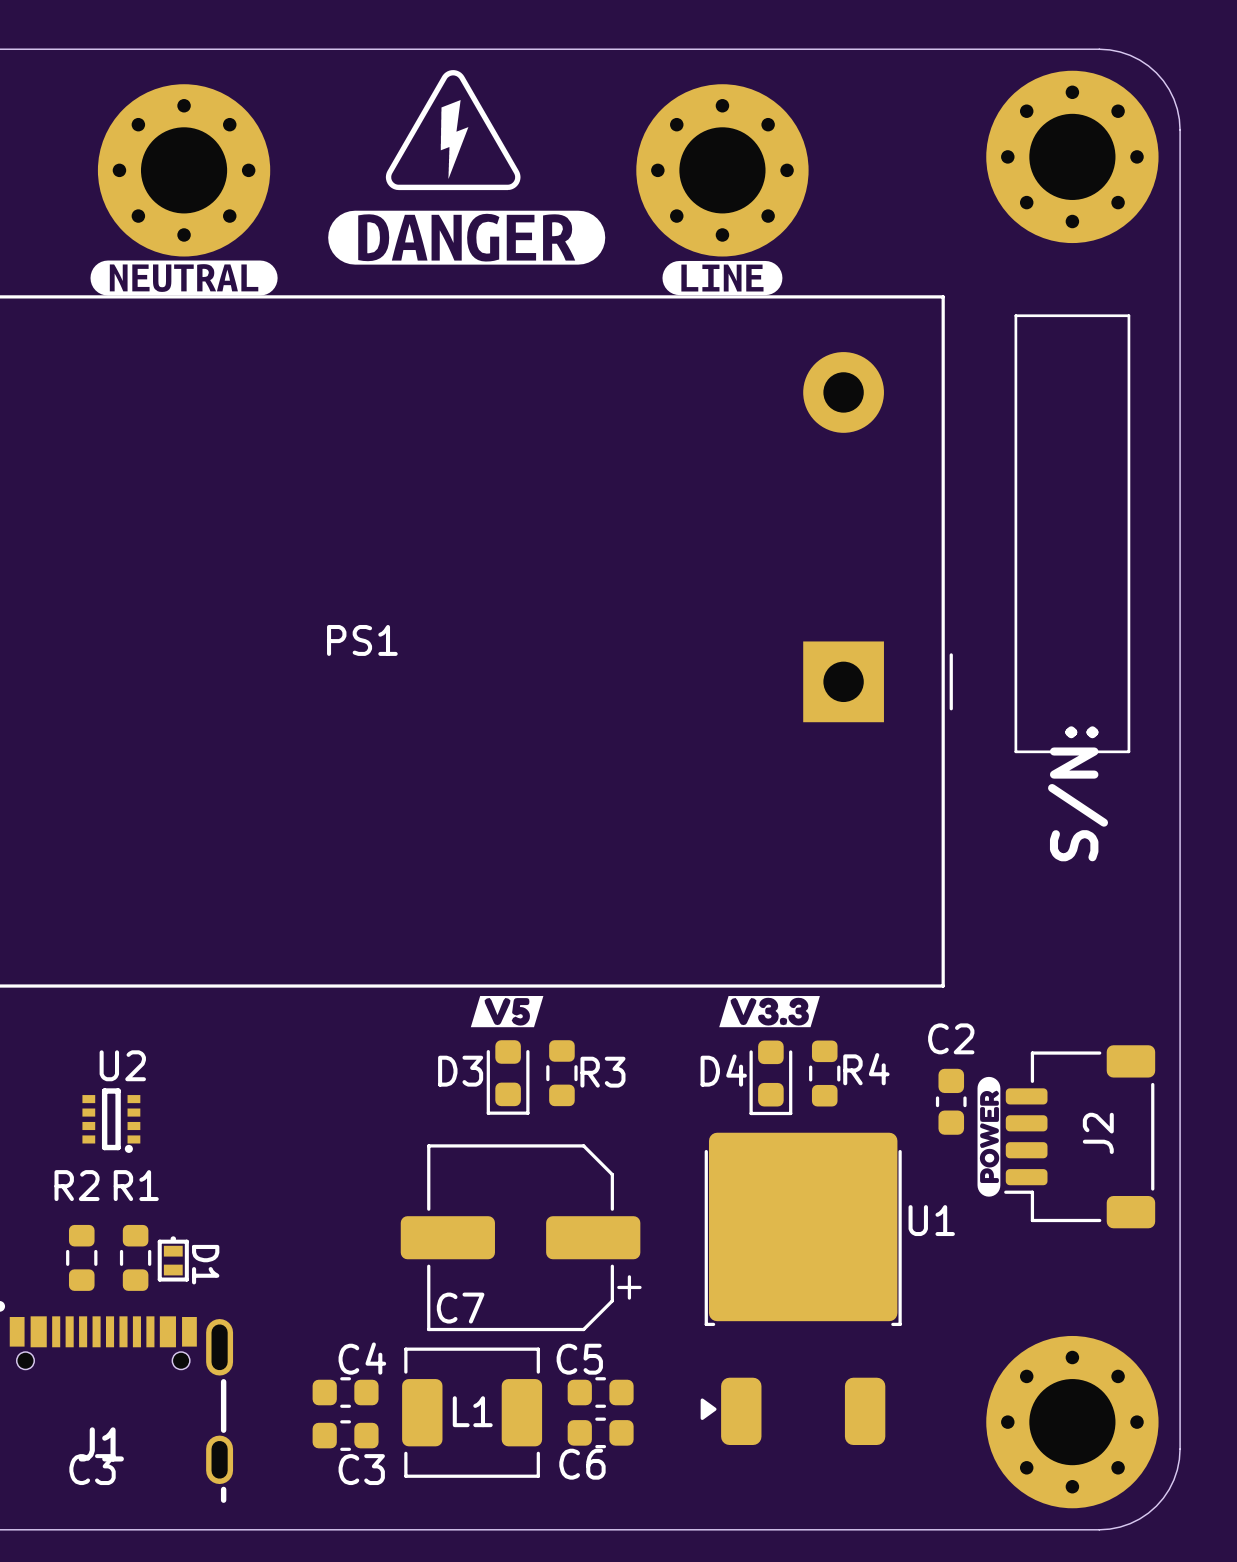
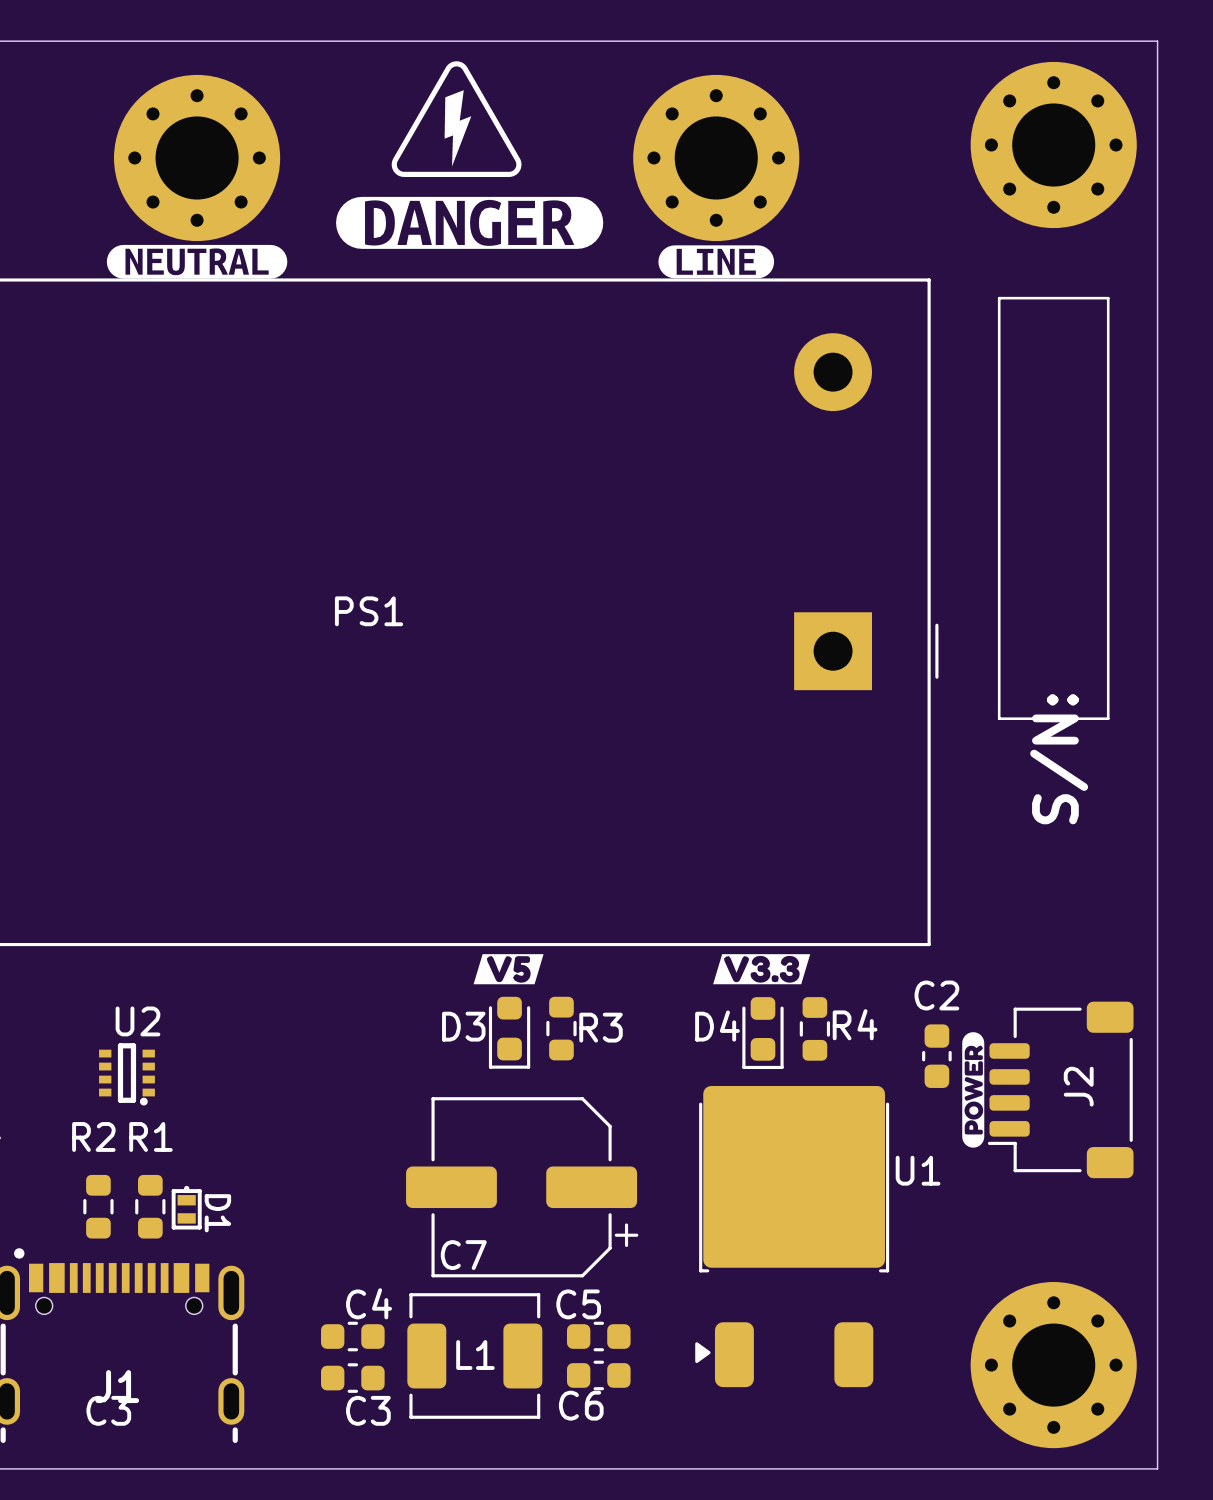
board edge: (1099, 49) (1130, 55) (1156, 72) (1173, 99) (1180, 129) -> (1079, 41) (1157, 41) (1157, 119)
board edge: (1180, 1449) (1173, 1479) (1156, 1506) (1130, 1523) (1099, 1529) -> (1157, 1391) (1157, 1468) (1079, 1468)

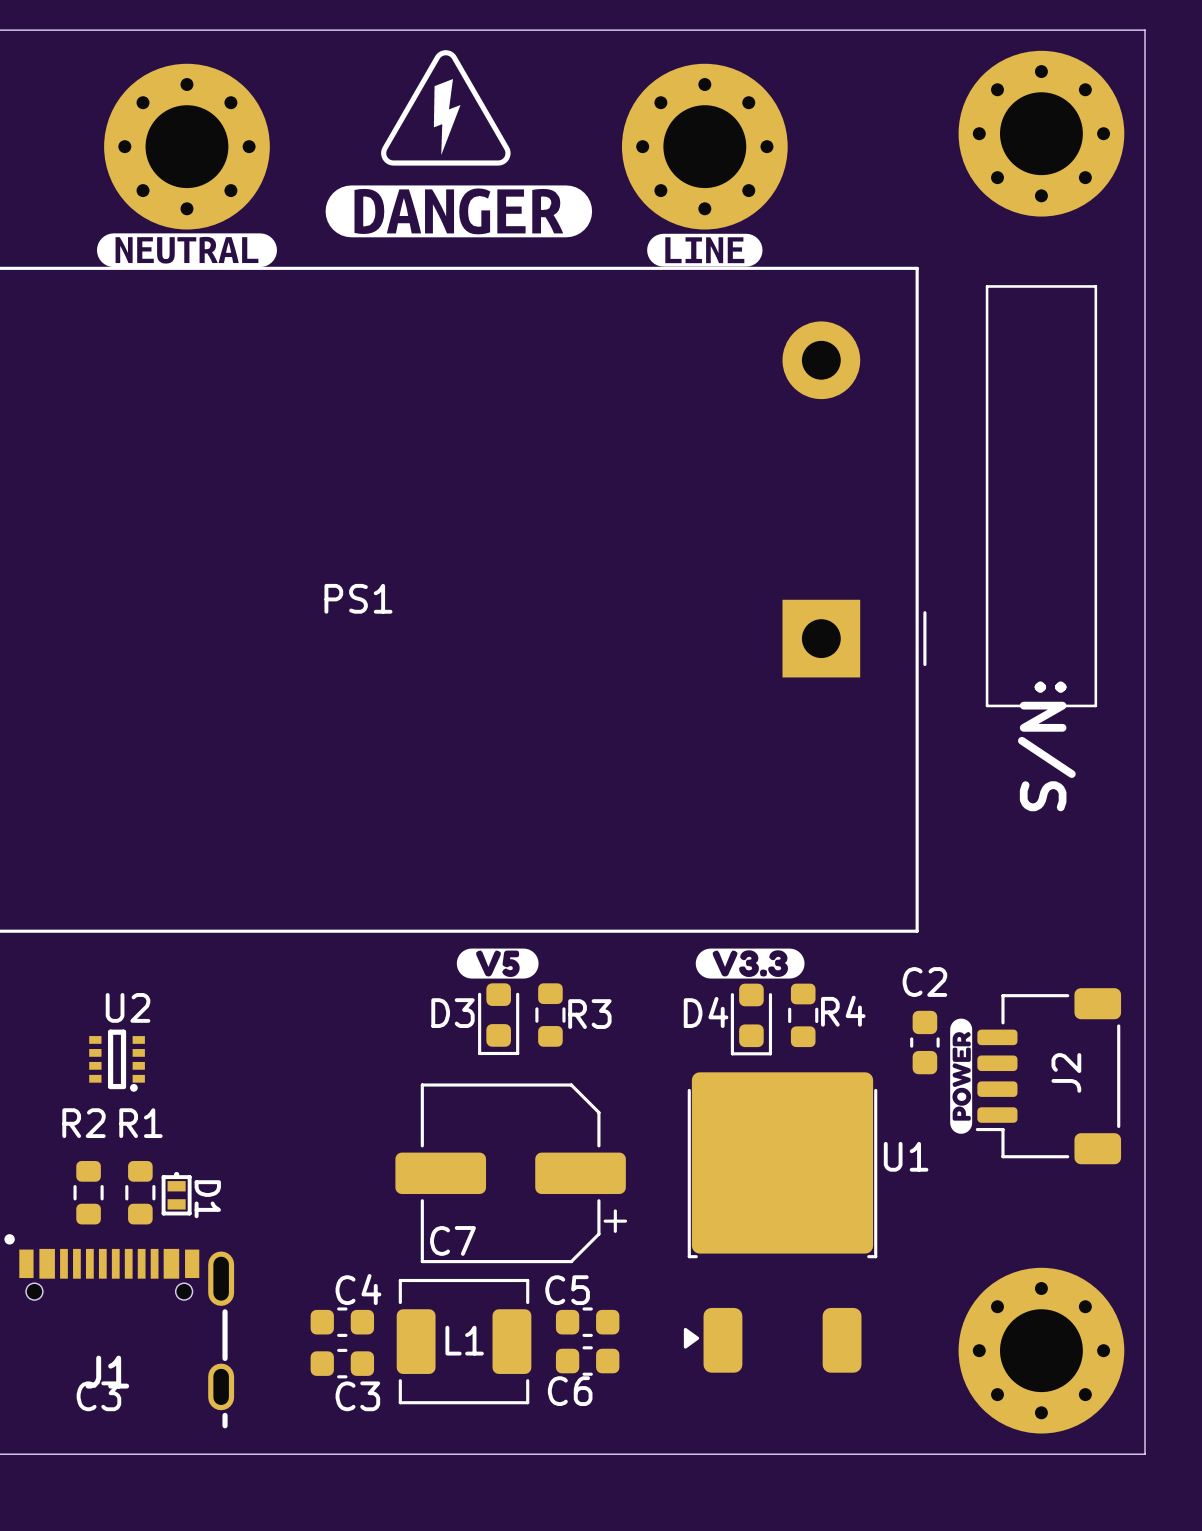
drawing shape: [473, 954, 544, 985] -> [456, 948, 539, 979]
drawing shape: [713, 954, 811, 985] -> [695, 948, 805, 979]

